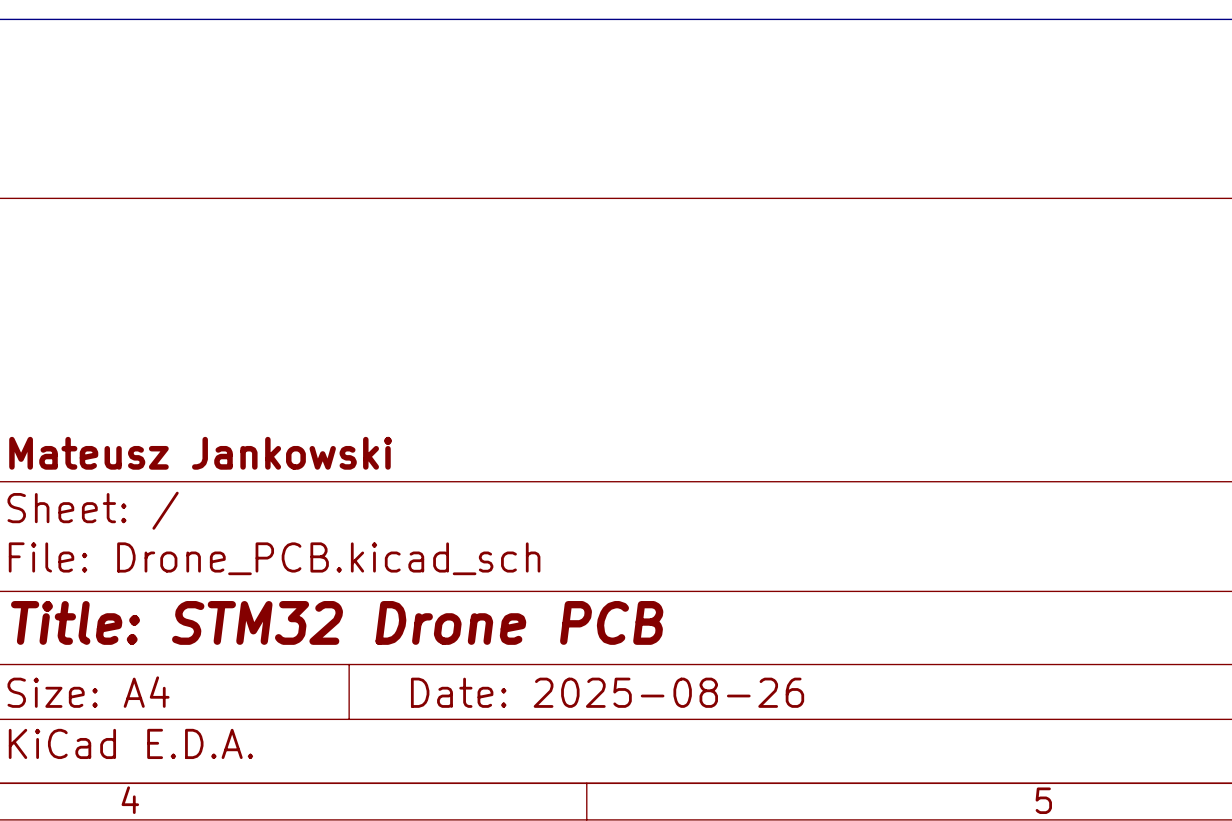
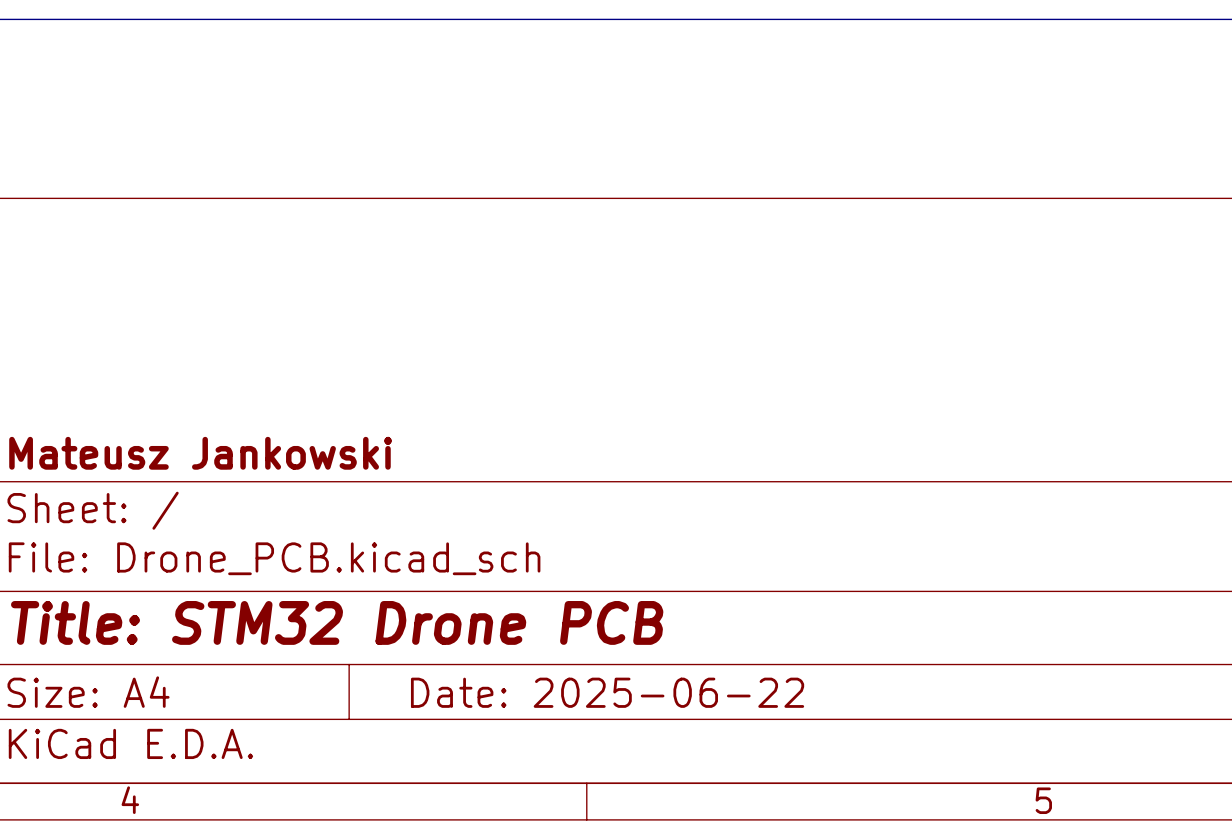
title block: Date: 2025-08-26 (607, 692) -> Date: 2025-06-22 (607, 692)

